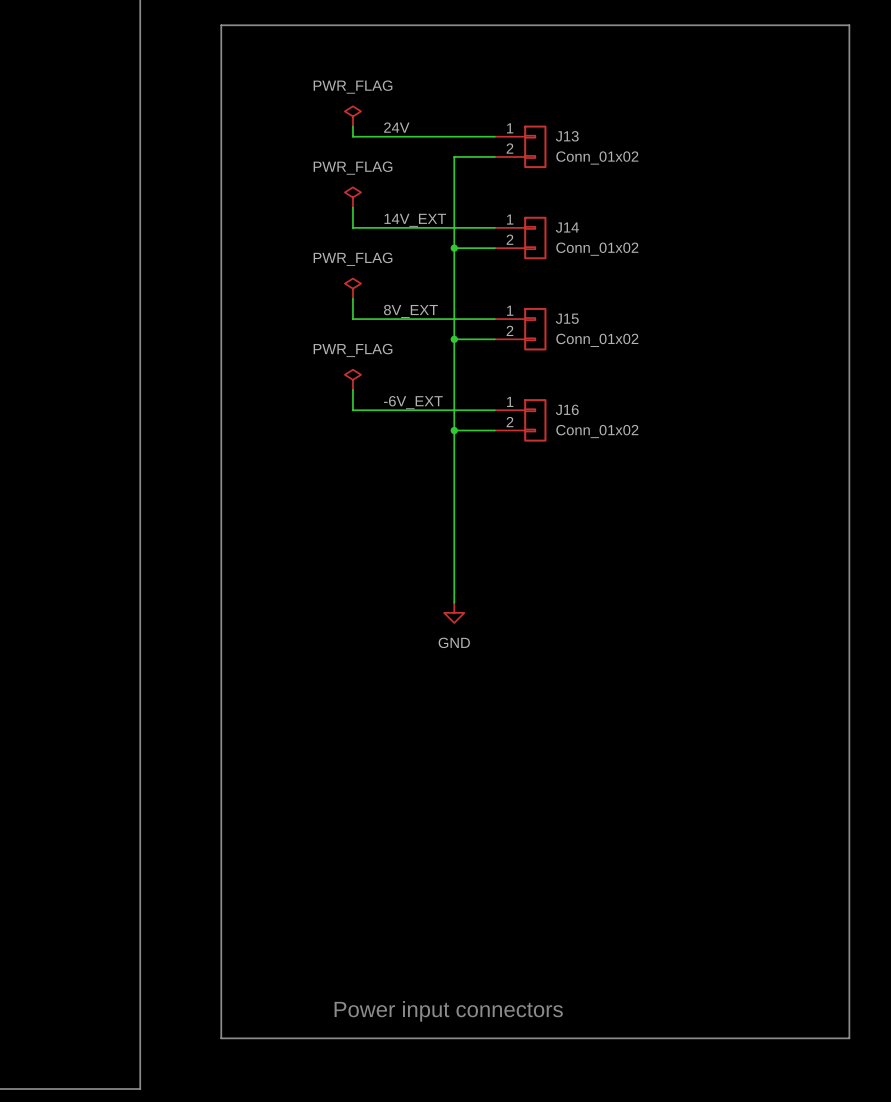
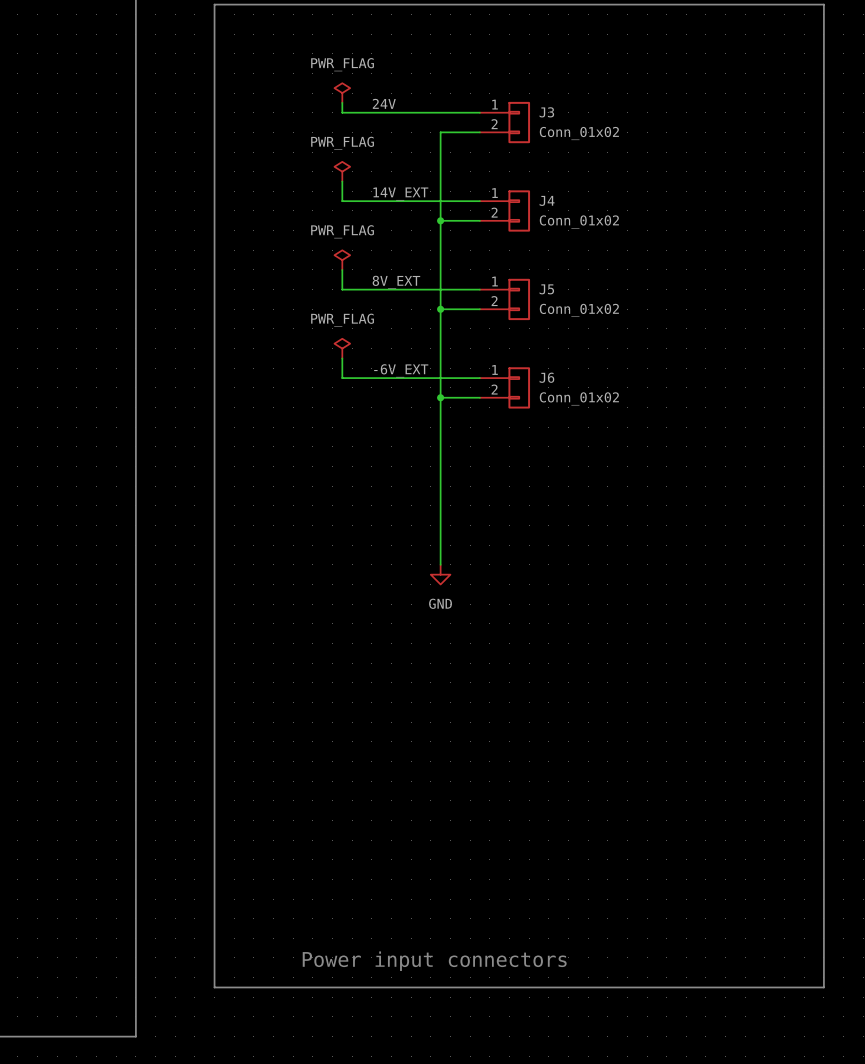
J13 name: J13 (567, 136) -> J3 (546, 112)
J14 name: J14 (567, 227) -> J4 (547, 200)
J15 name: J15 (567, 318) -> J5 (546, 289)
J16 name: J16 (567, 409) -> J6 (546, 377)

